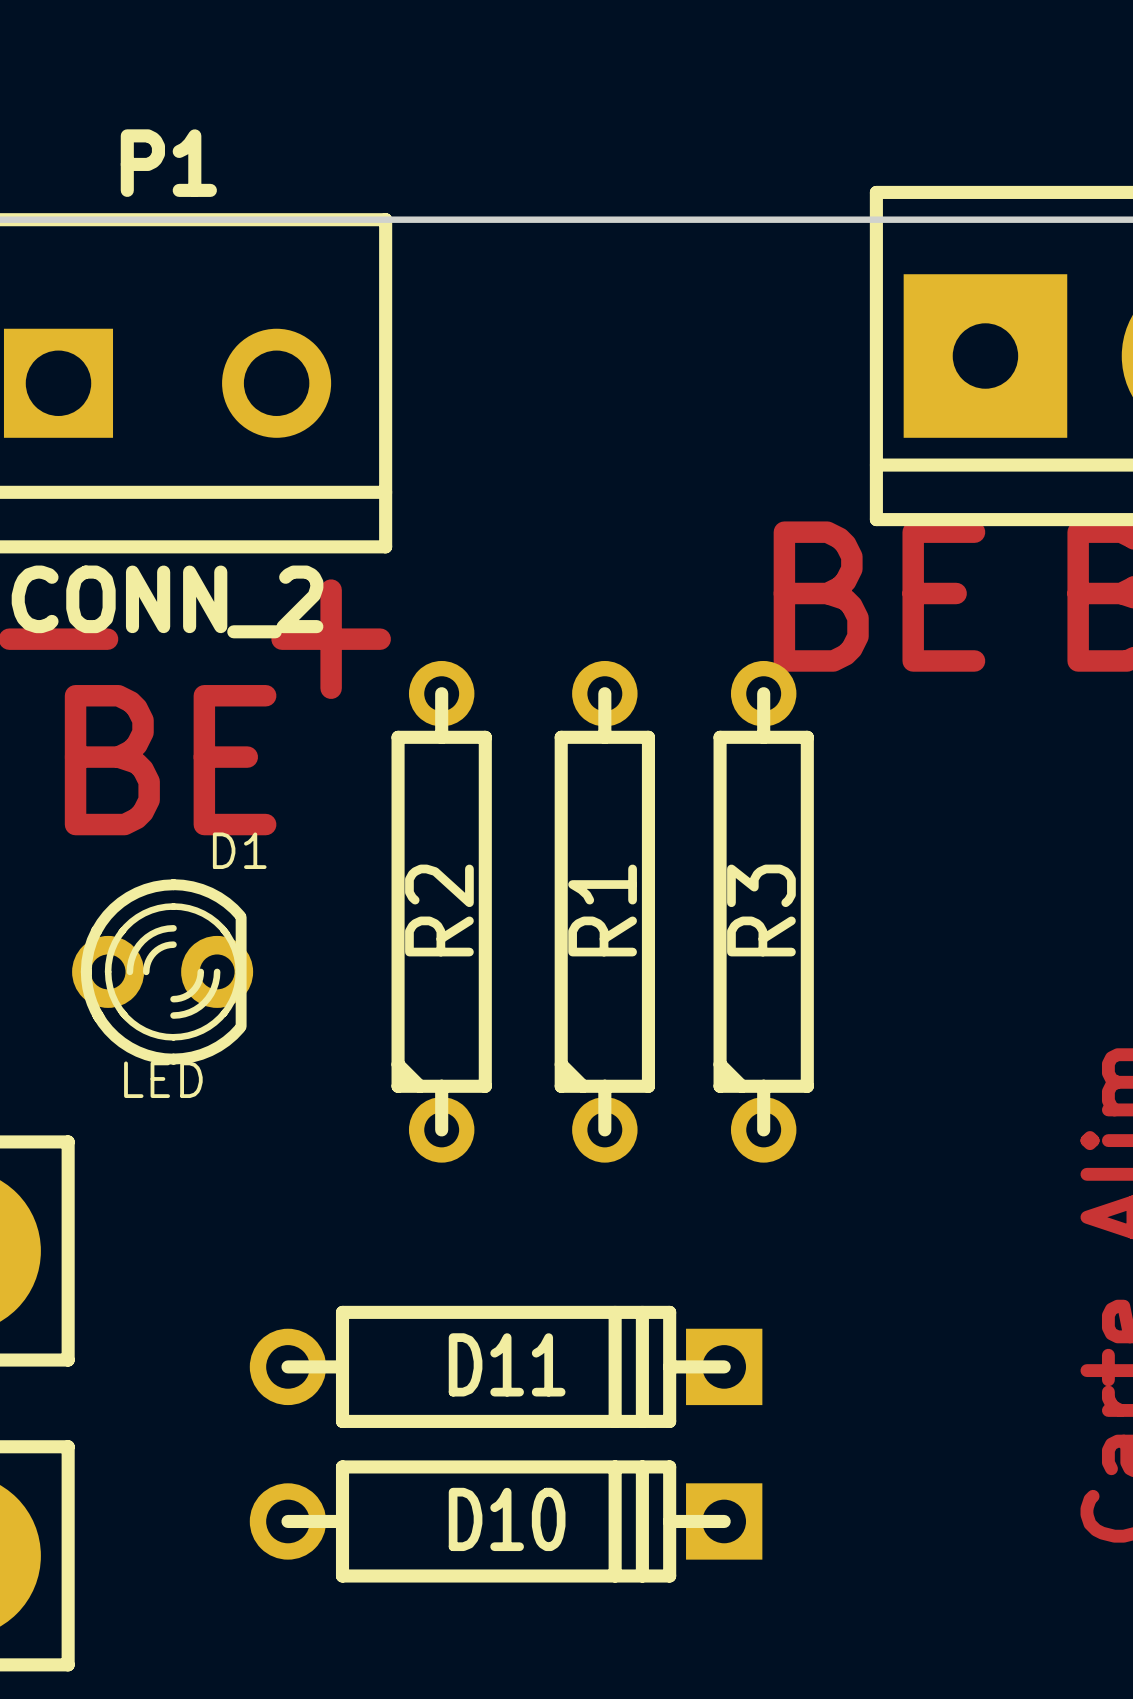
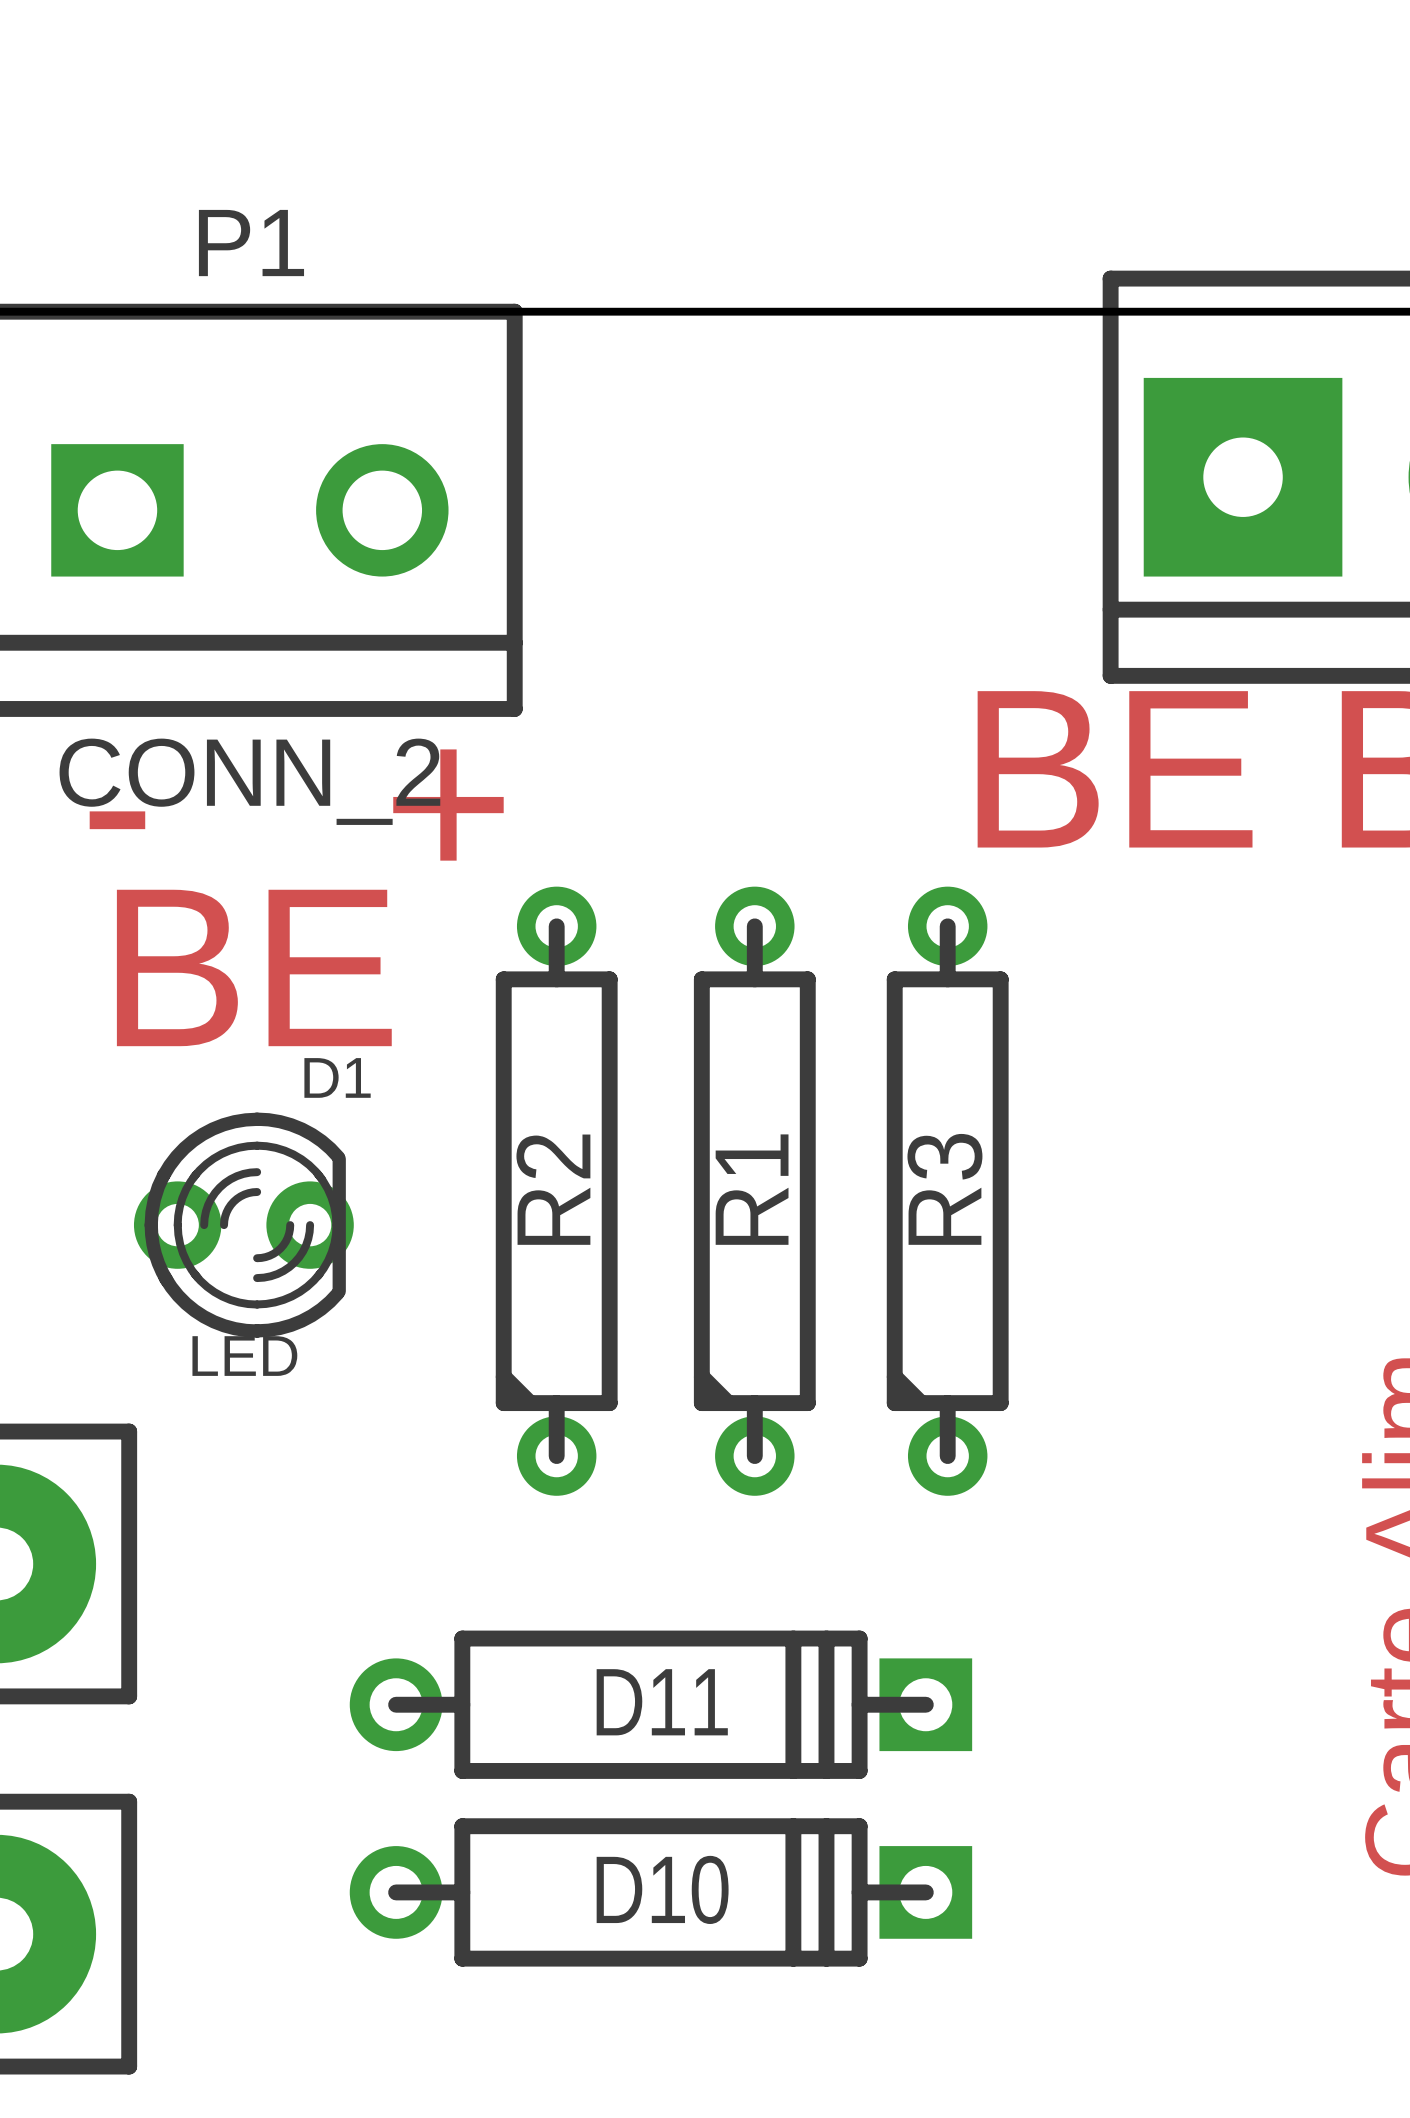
R2 position: (441, 911) -> (556, 1191)
R1 position: (604, 911) -> (754, 1191)
R3 position: (763, 911) -> (947, 1191)

